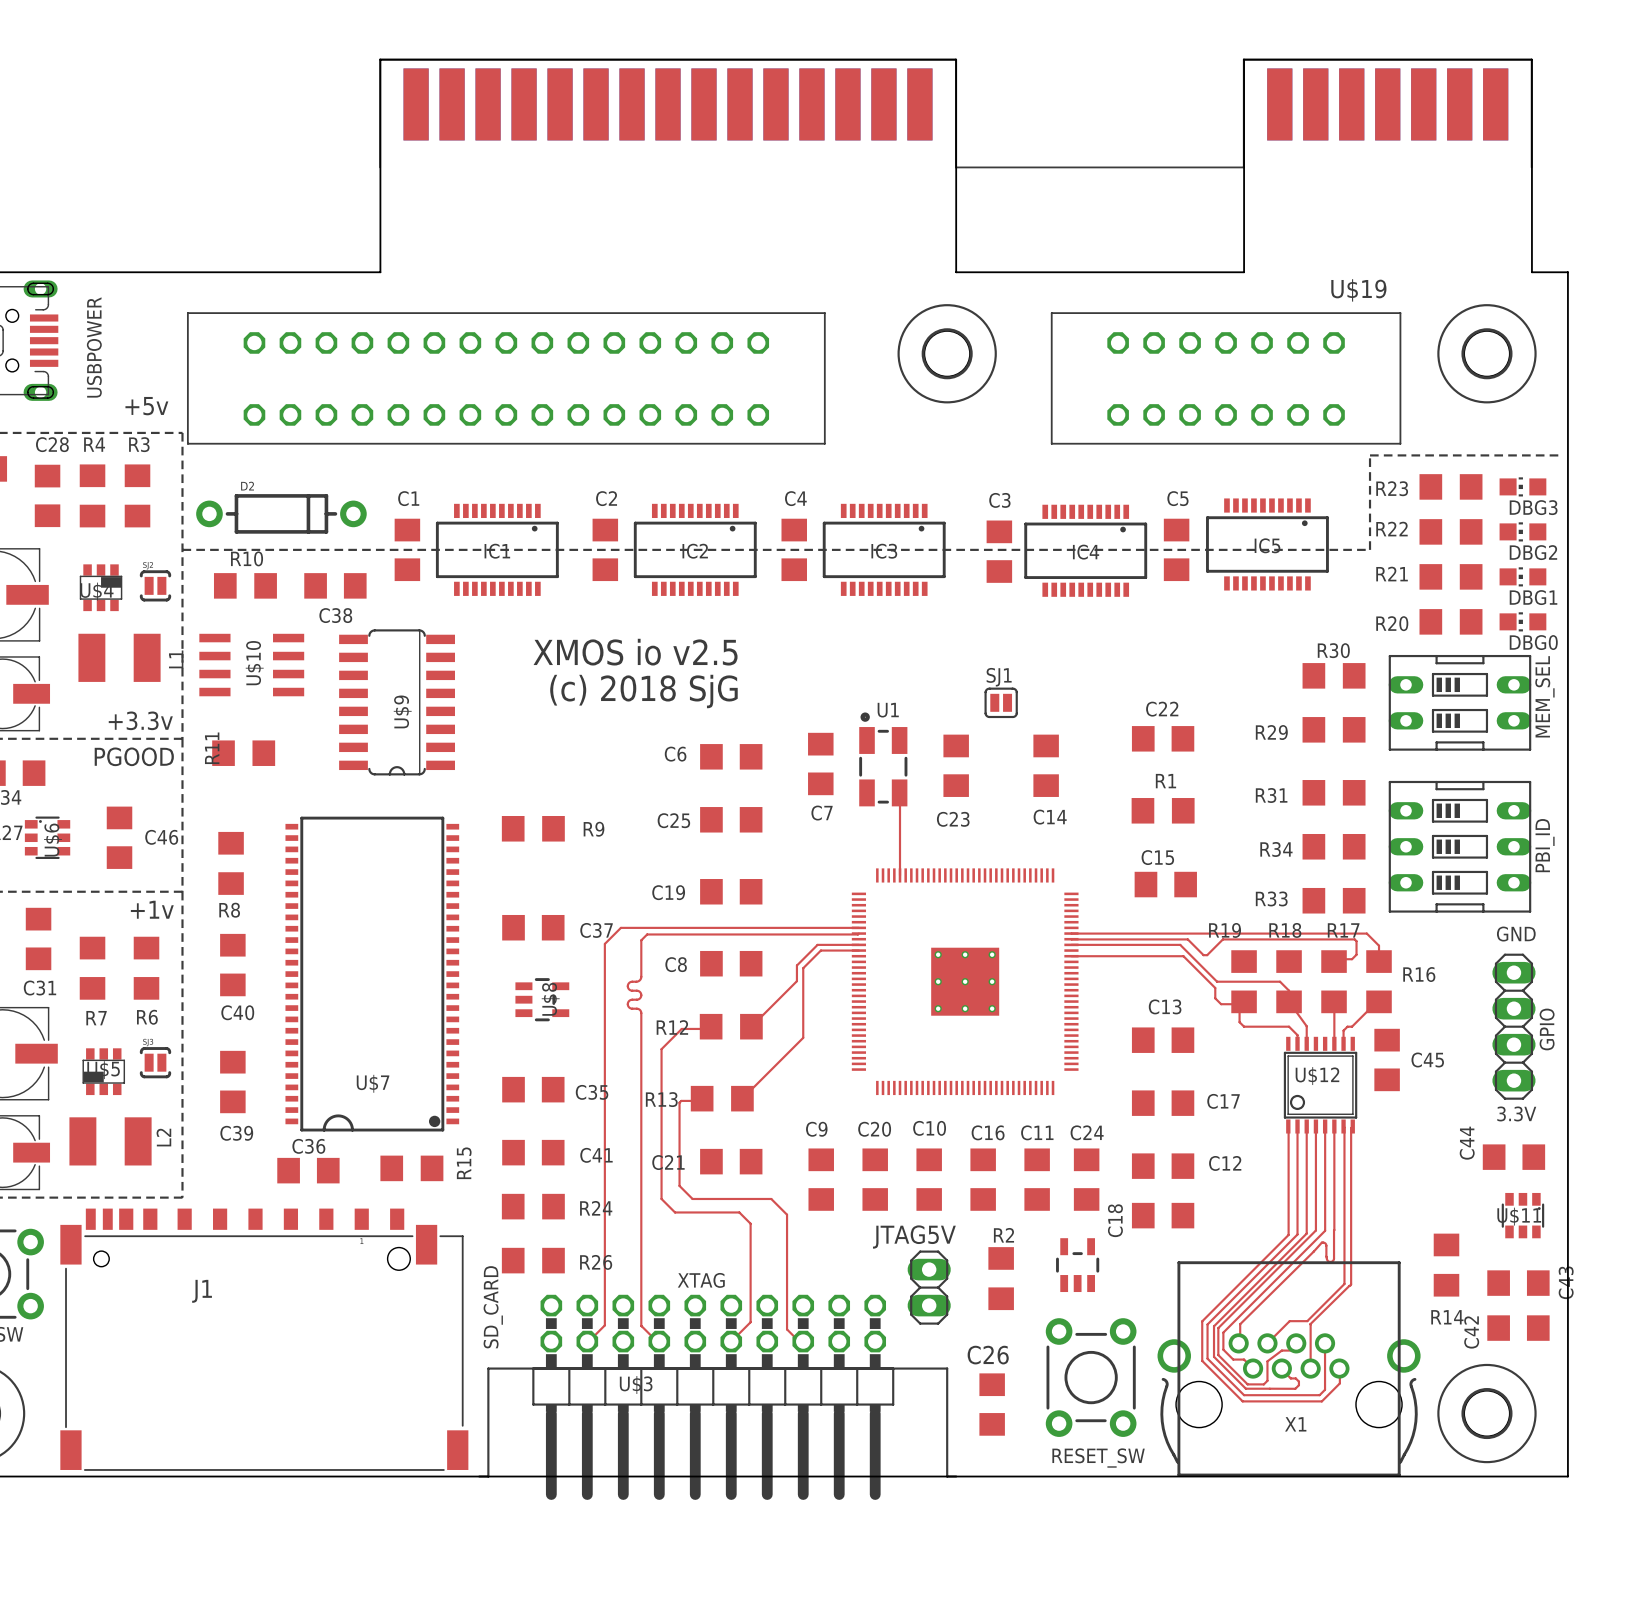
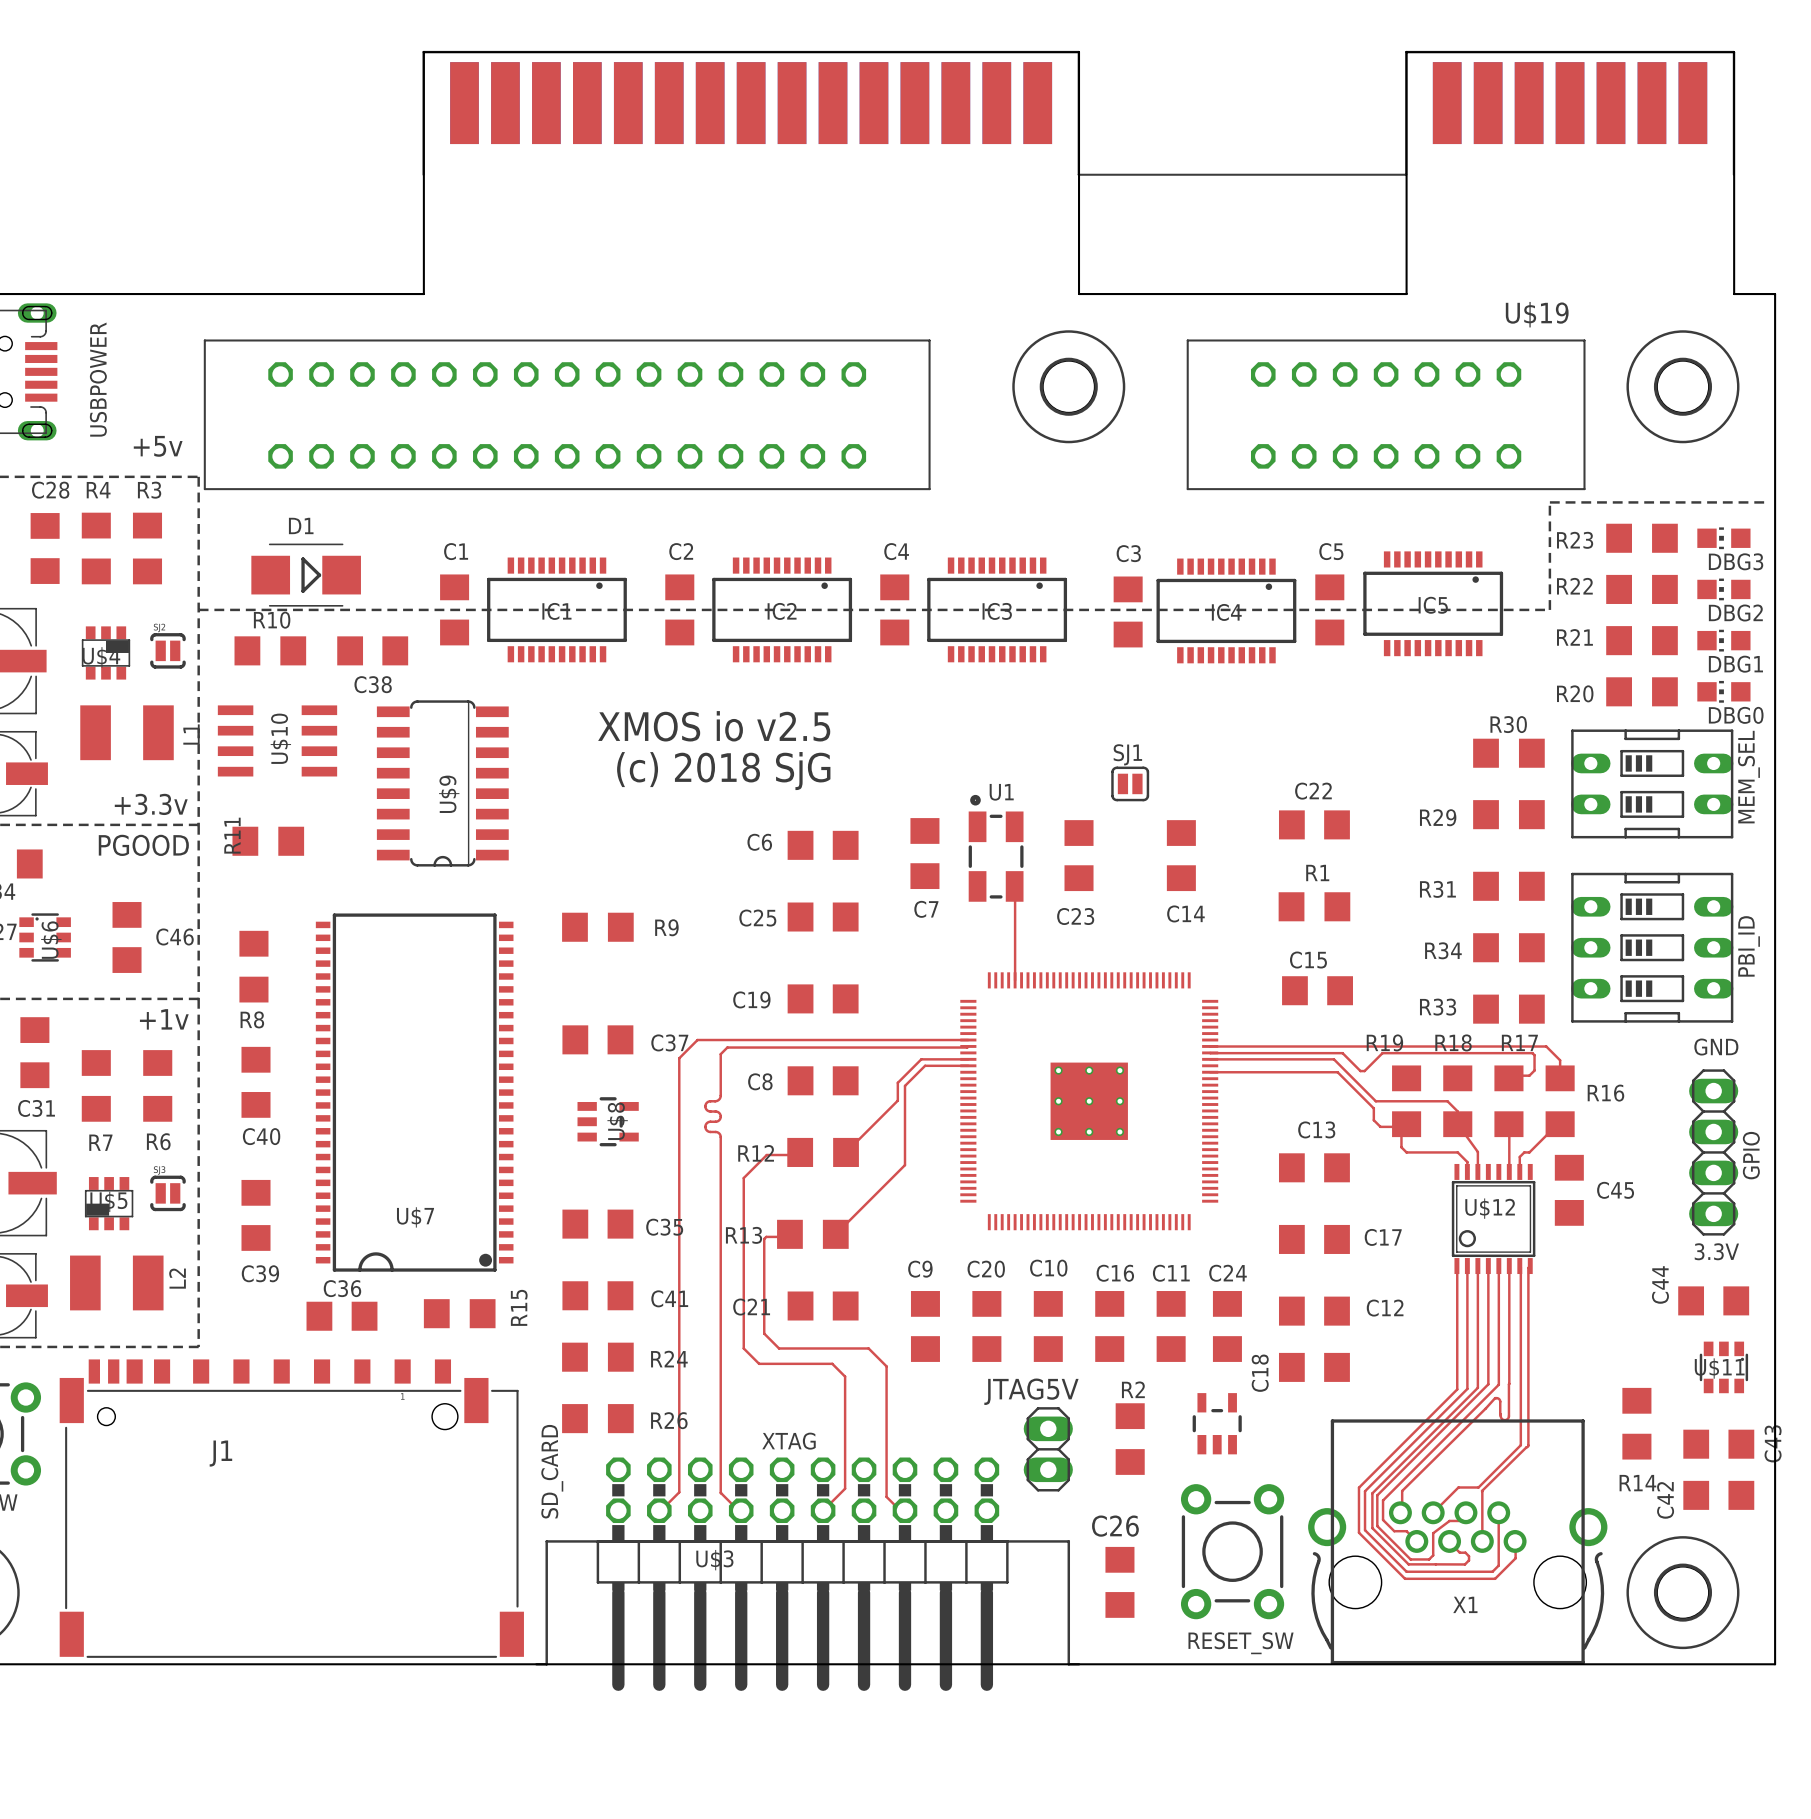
D2: (281, 513) -> none
D1: none -> (306, 575)

